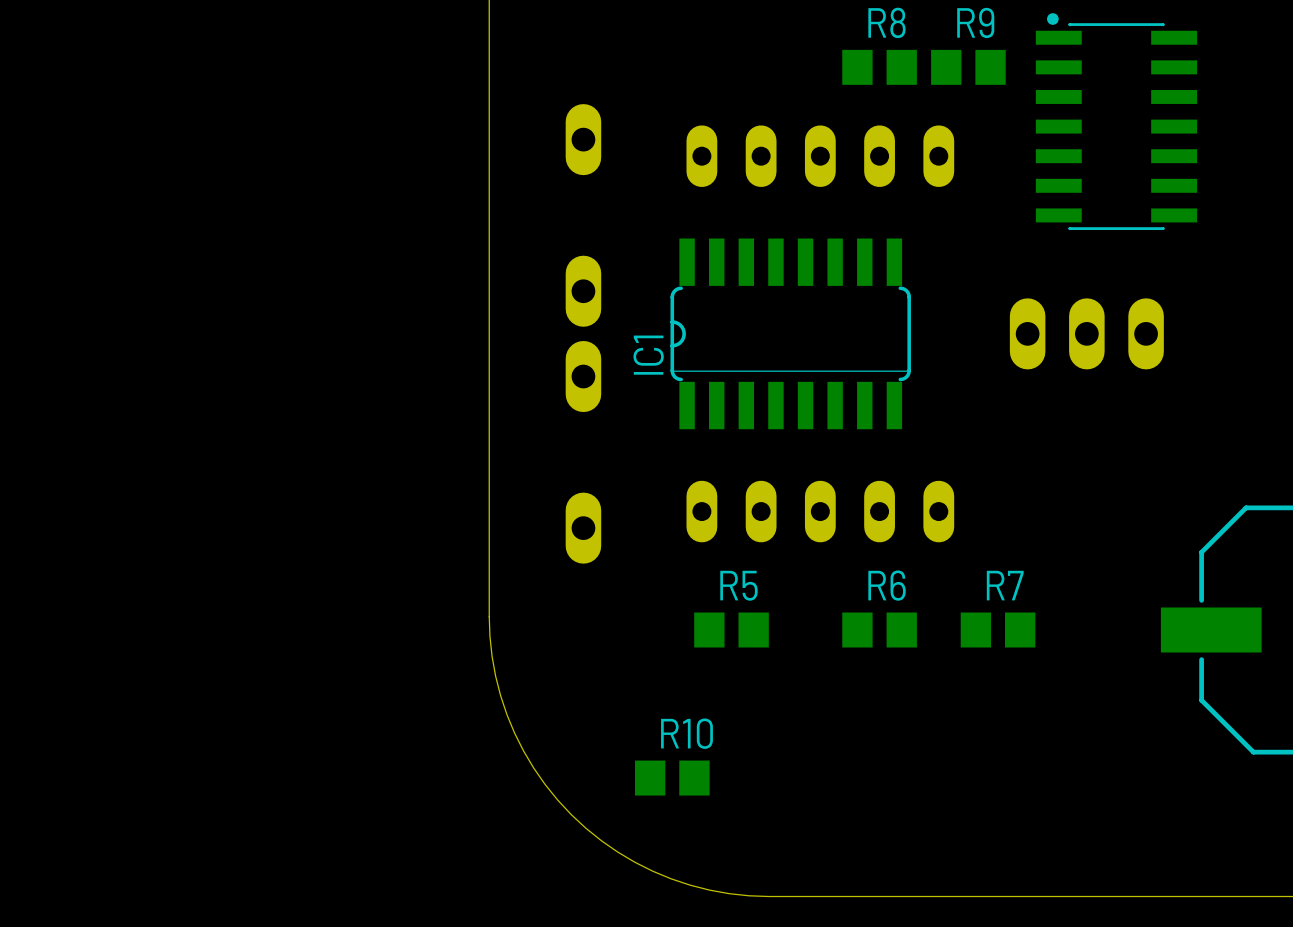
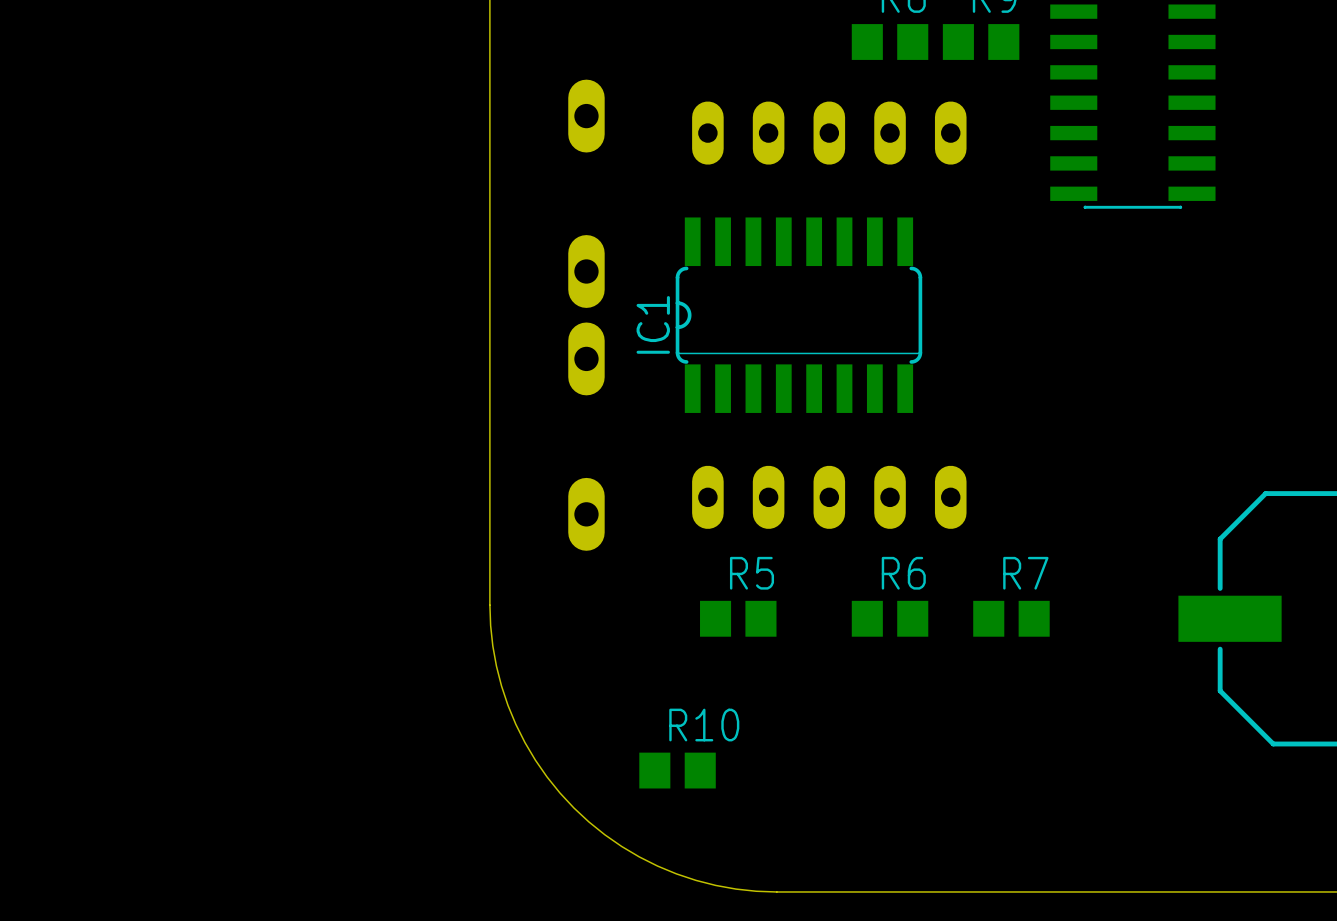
part: (1086, 333) -> none

